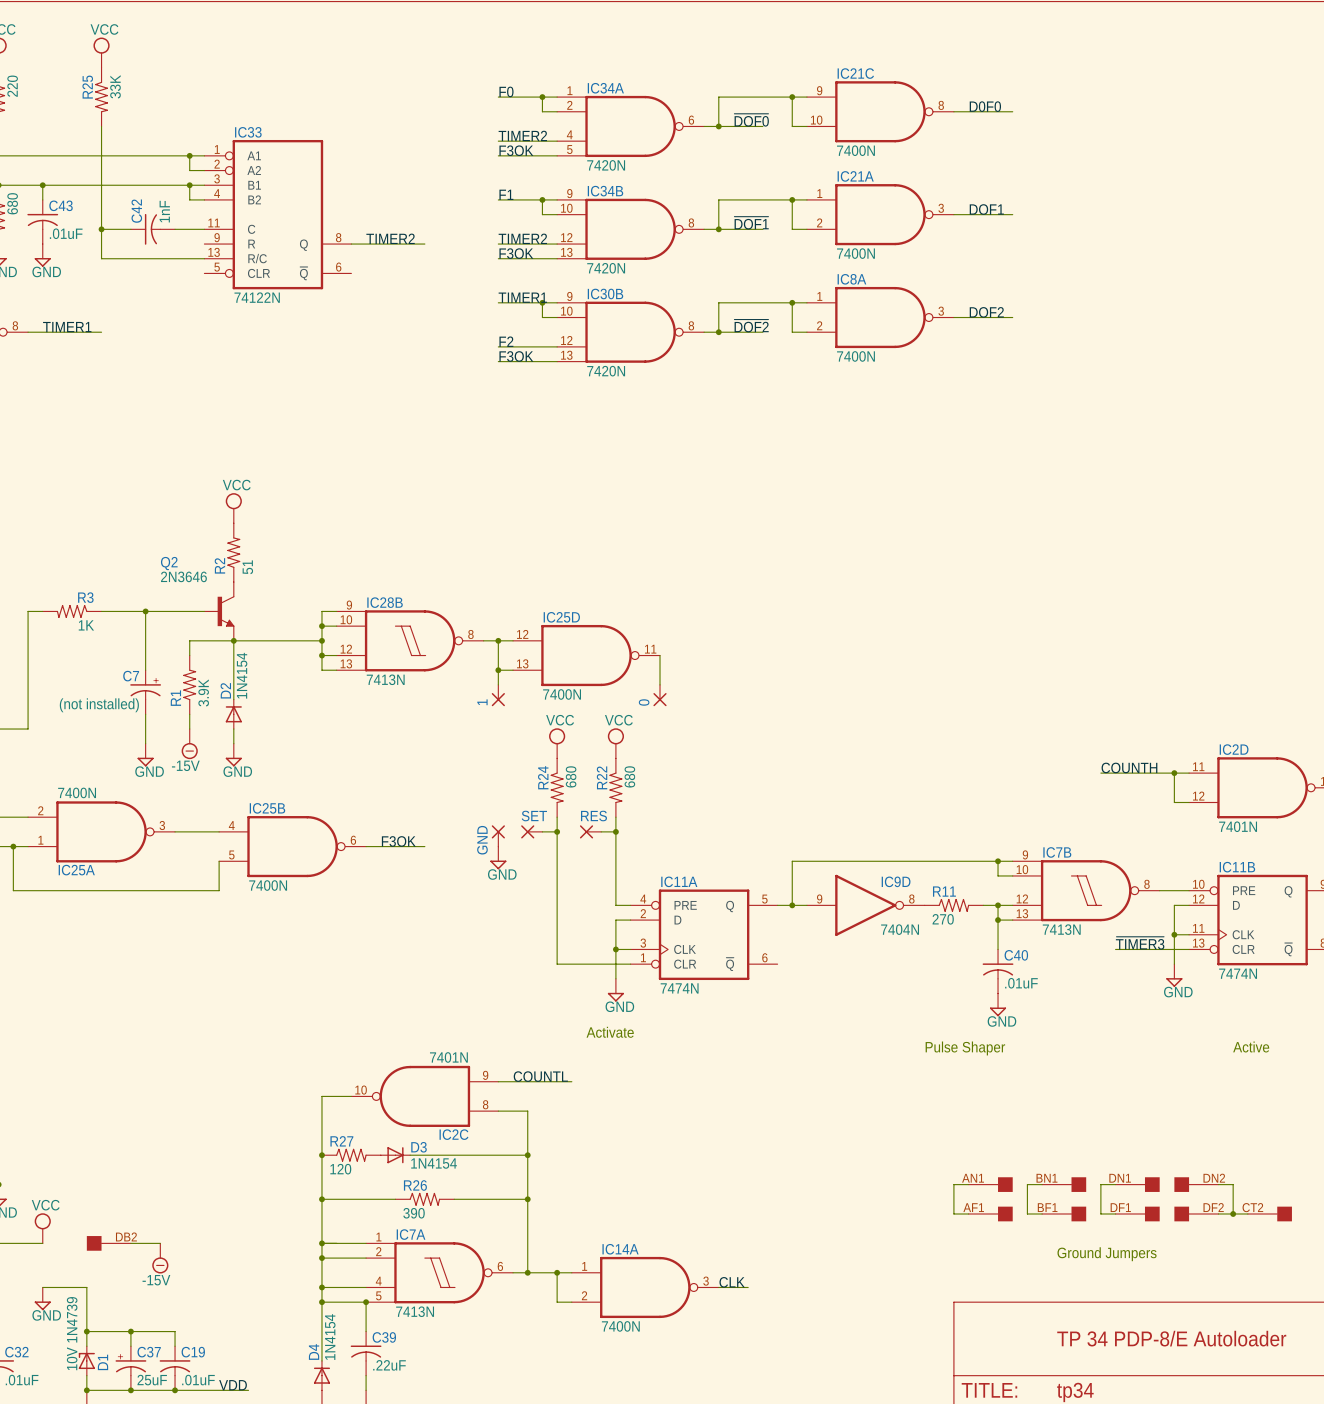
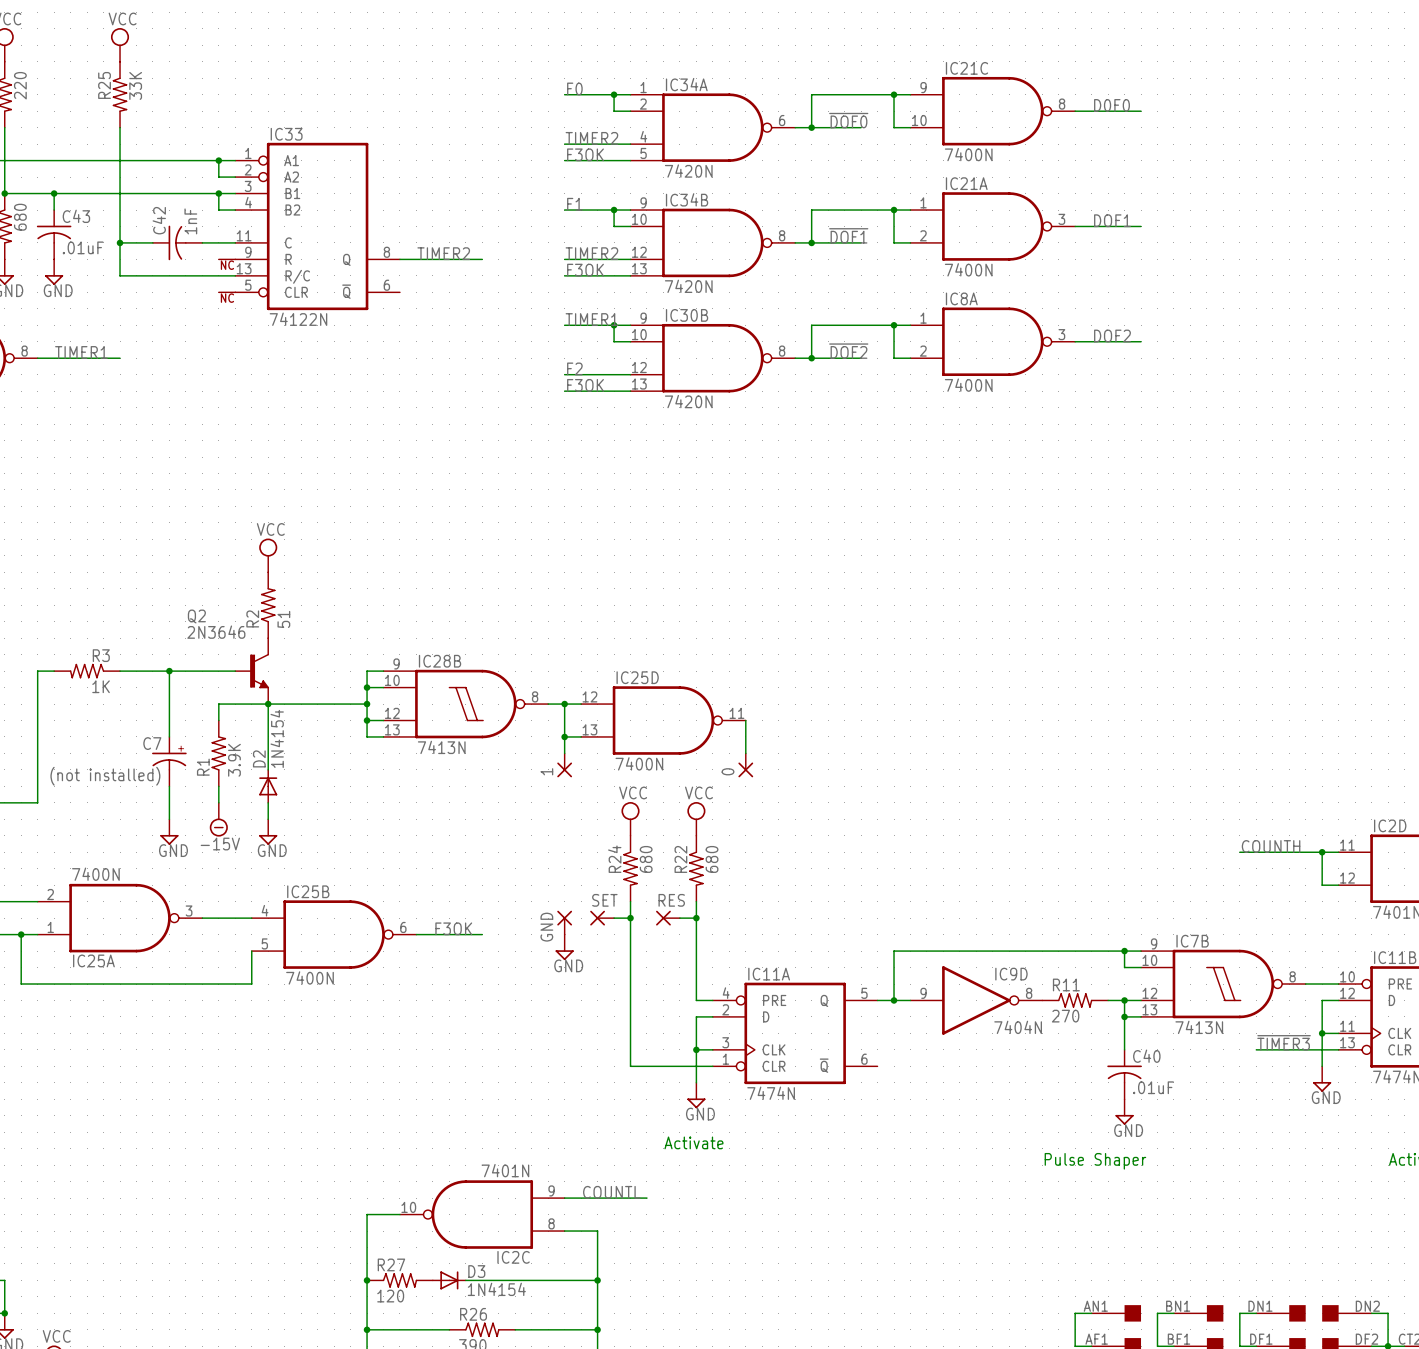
power symbol: none -> (227, 259)
power symbol: none -> (227, 292)

